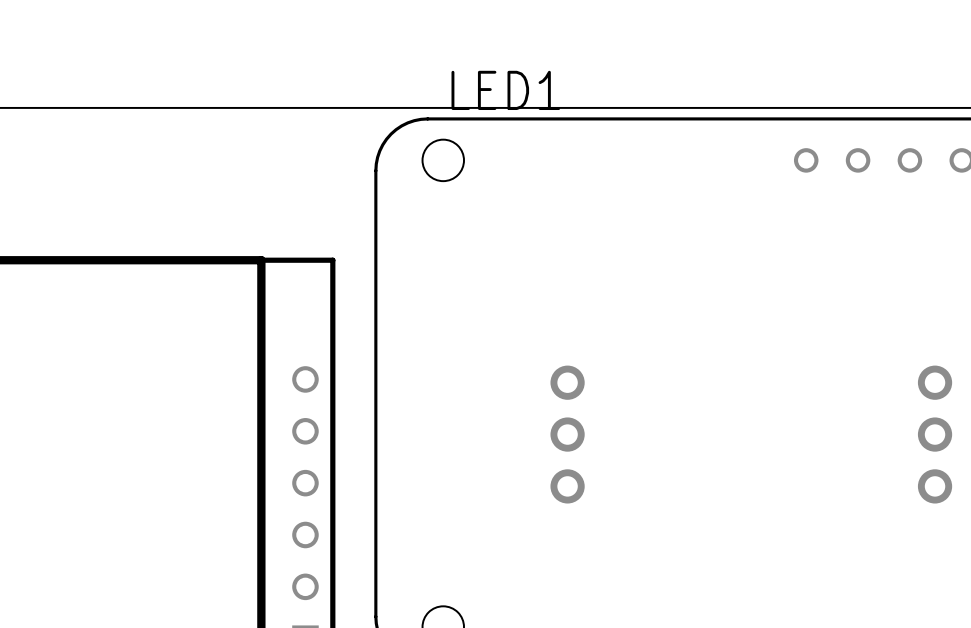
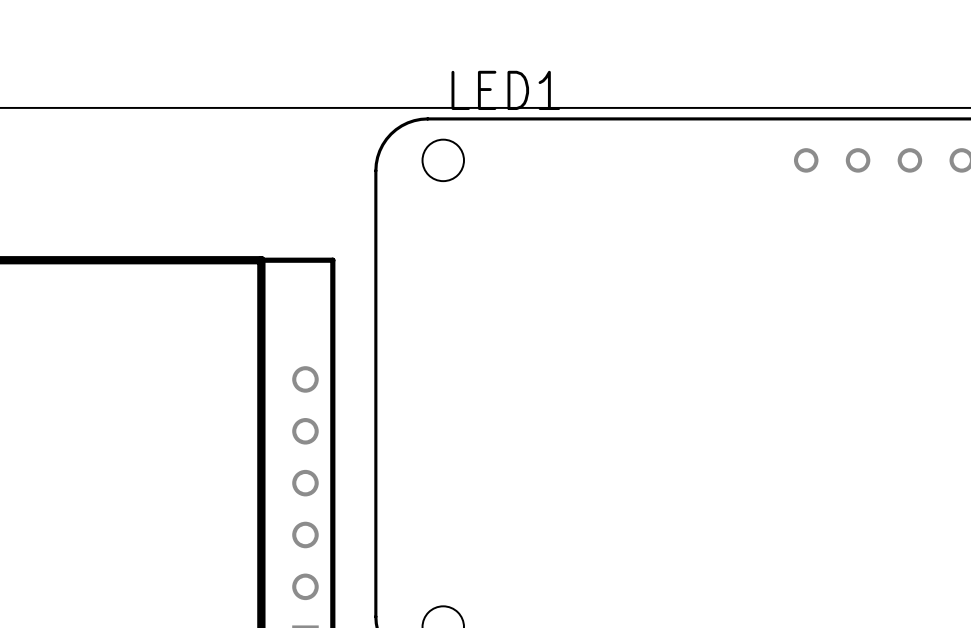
part: (567, 434) -> none
part: (935, 434) -> none

